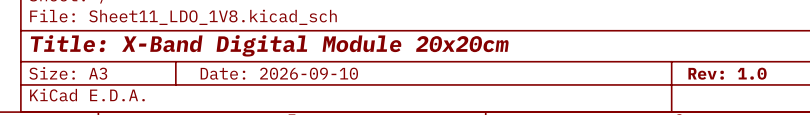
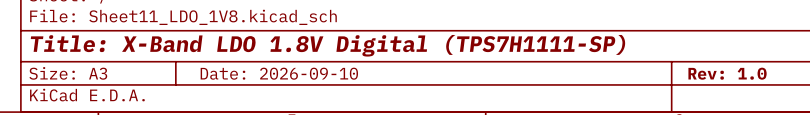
title block: Title: X-Band Digital Module 20x20cm (269, 45) -> Title: X-Band LDO 1.8V Digital (TPS7H1111-SP) (328, 45)

